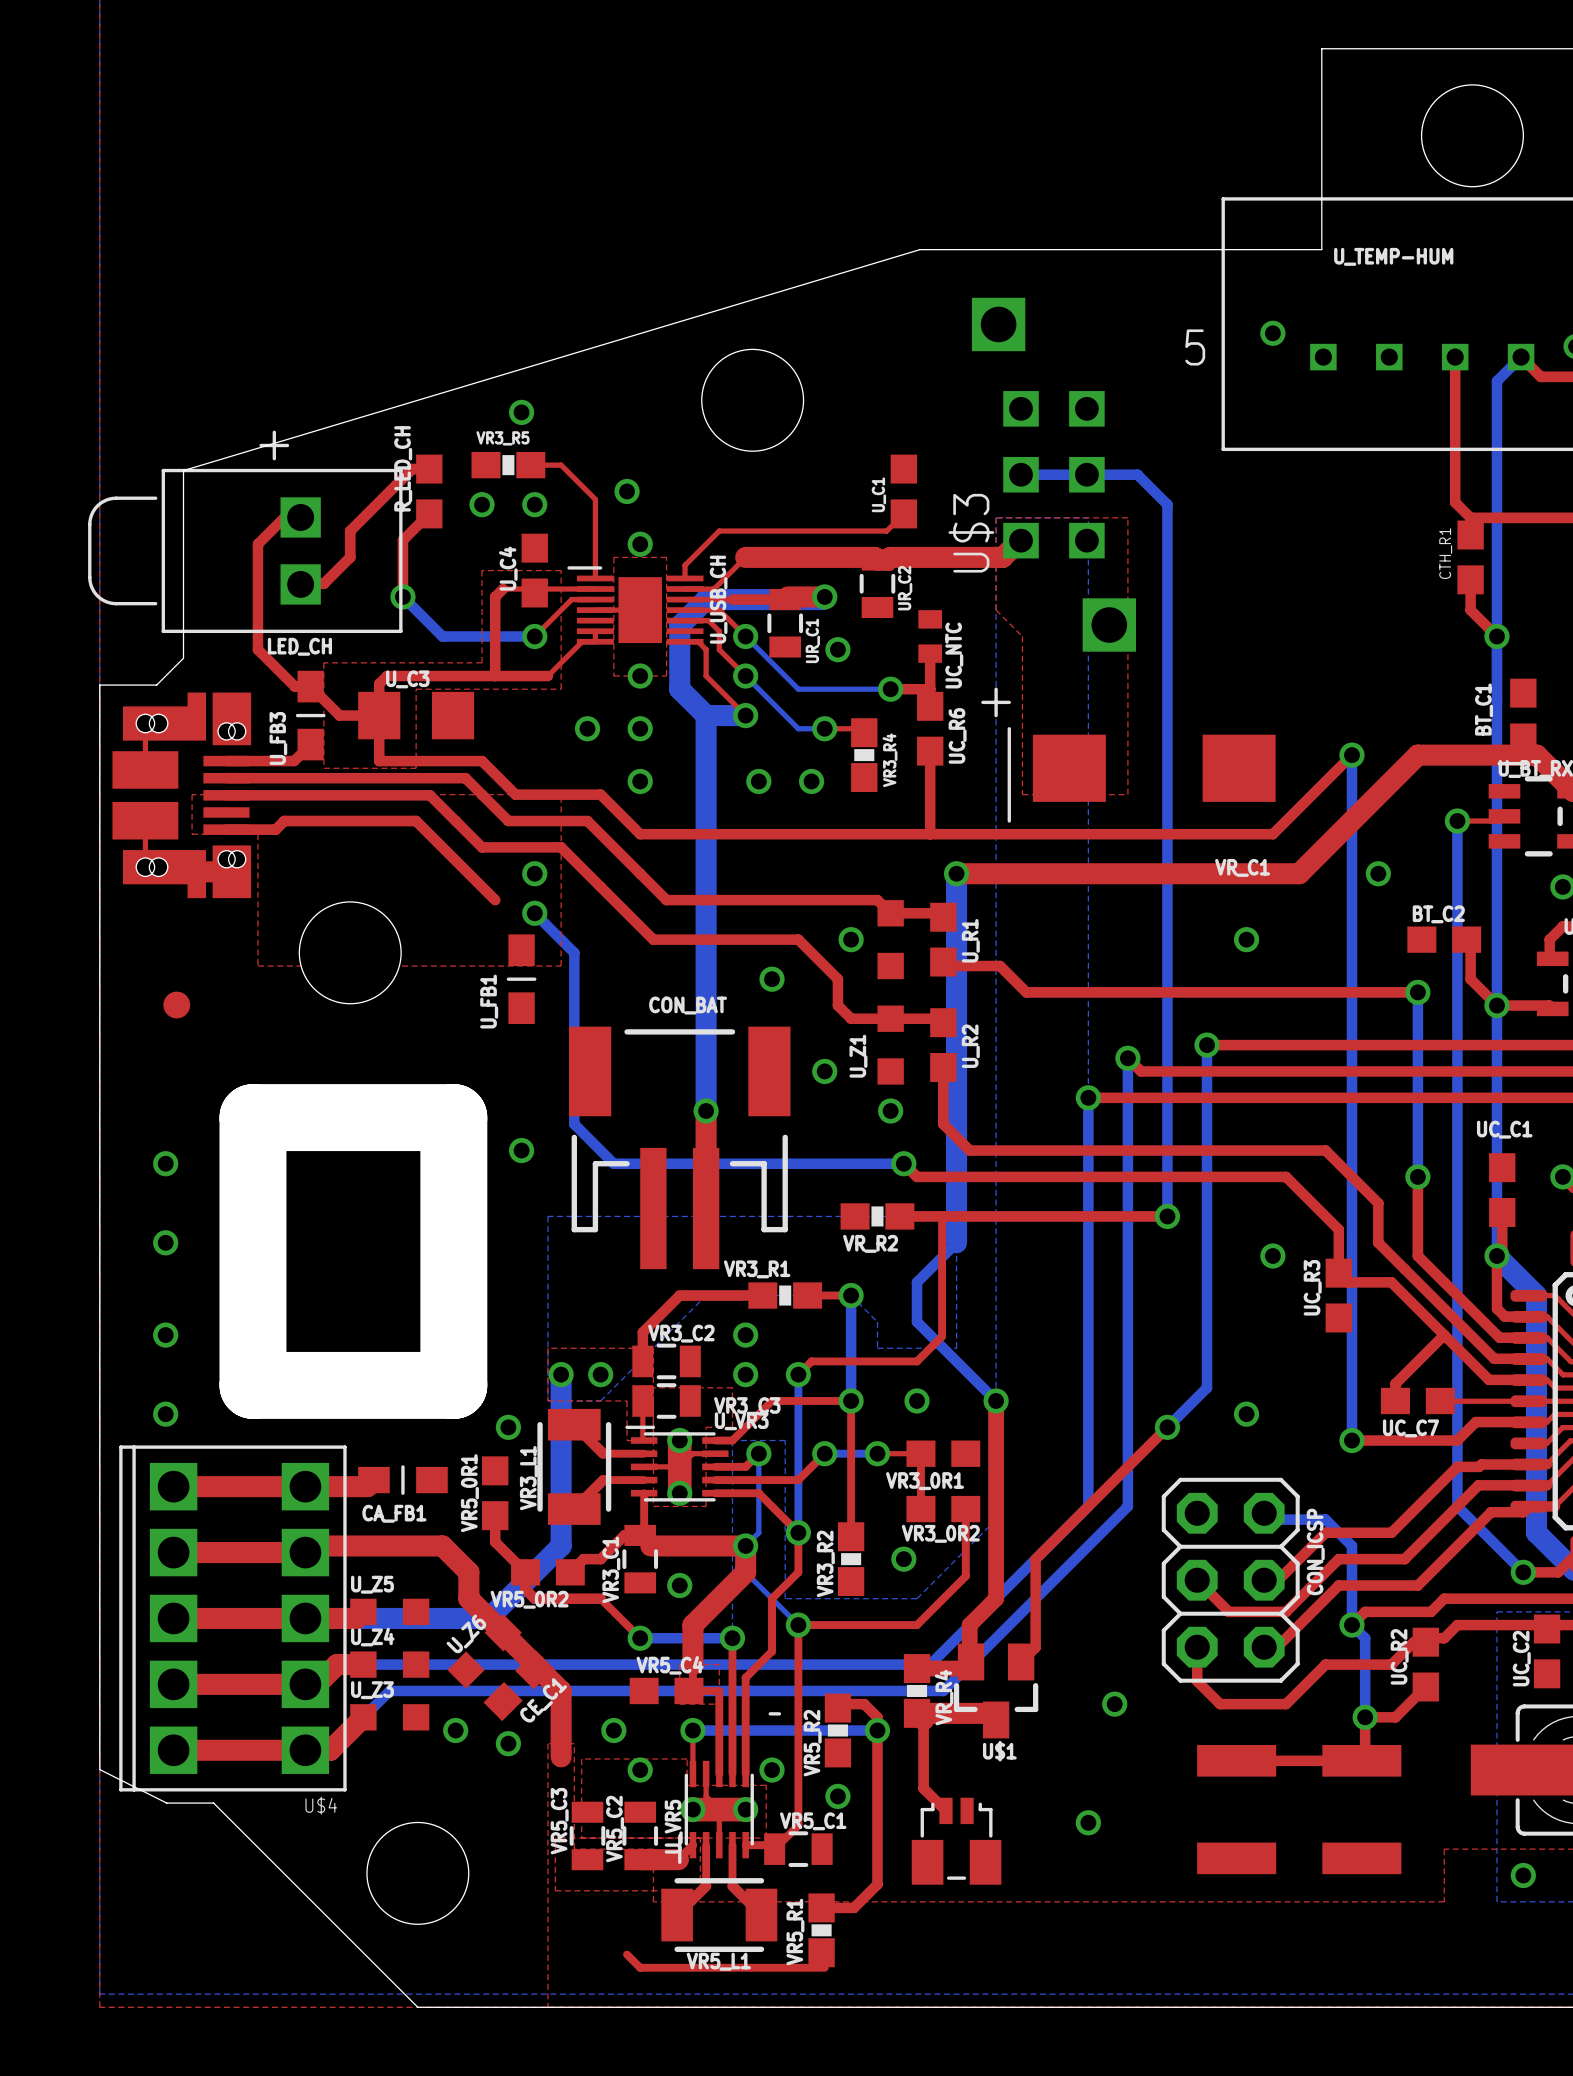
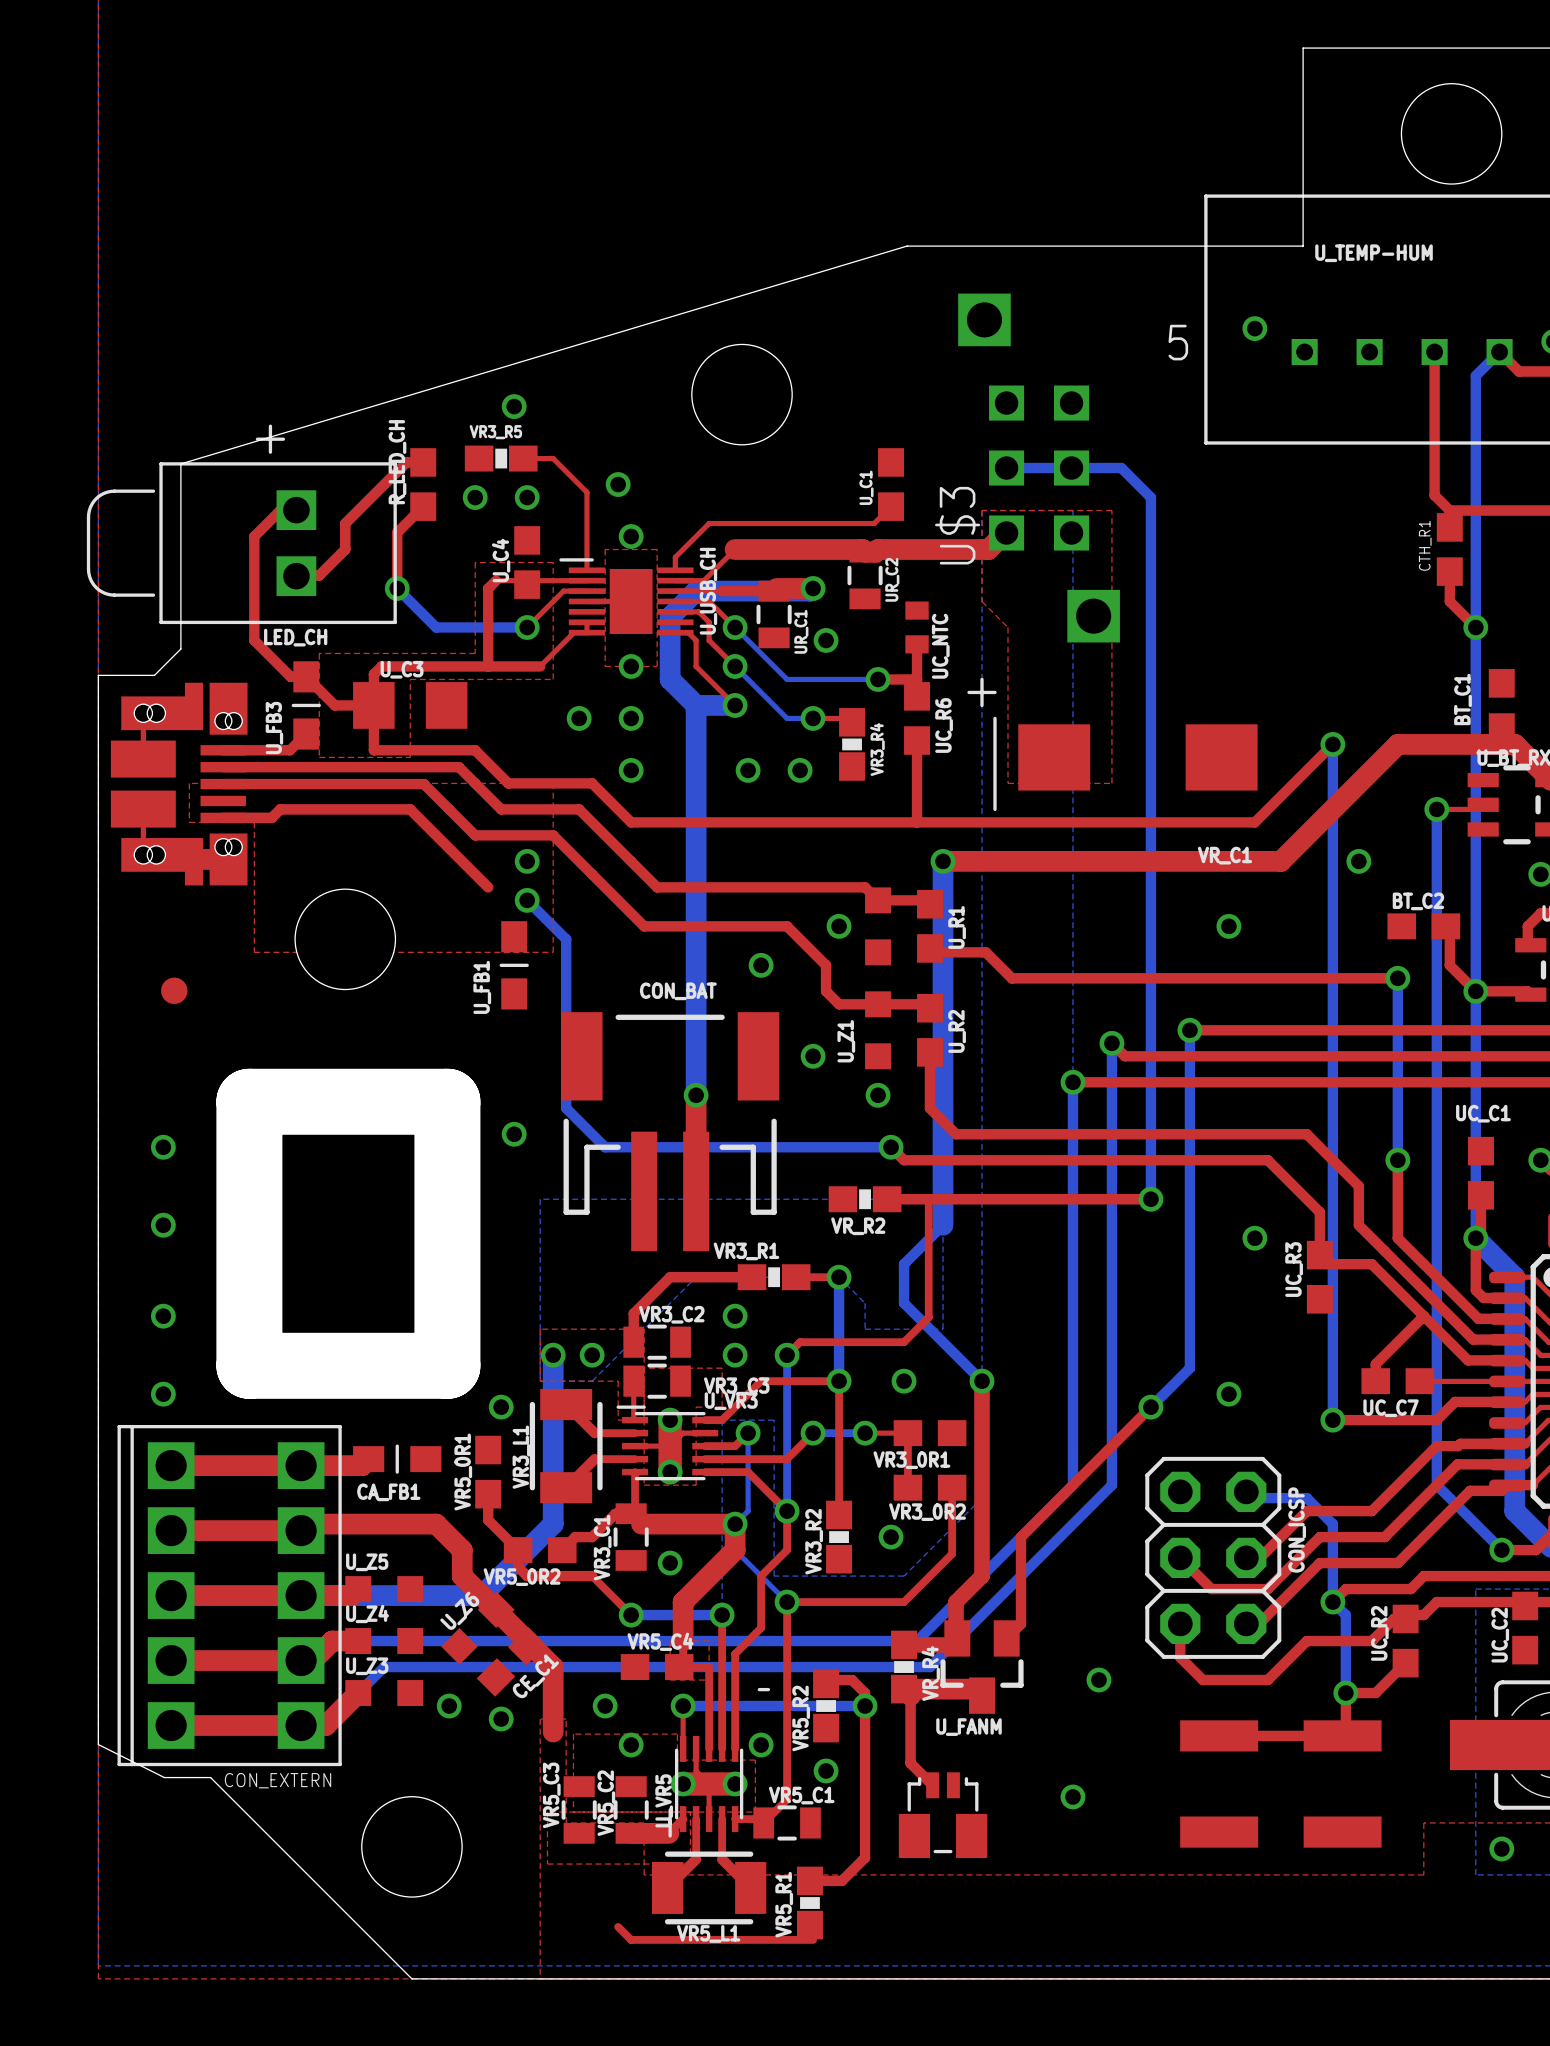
U$1 name: U$1 (999, 1751) -> U_FANM (968, 1727)
U$4 name: U$4 (321, 1805) -> CON_EXTERN (278, 1780)

